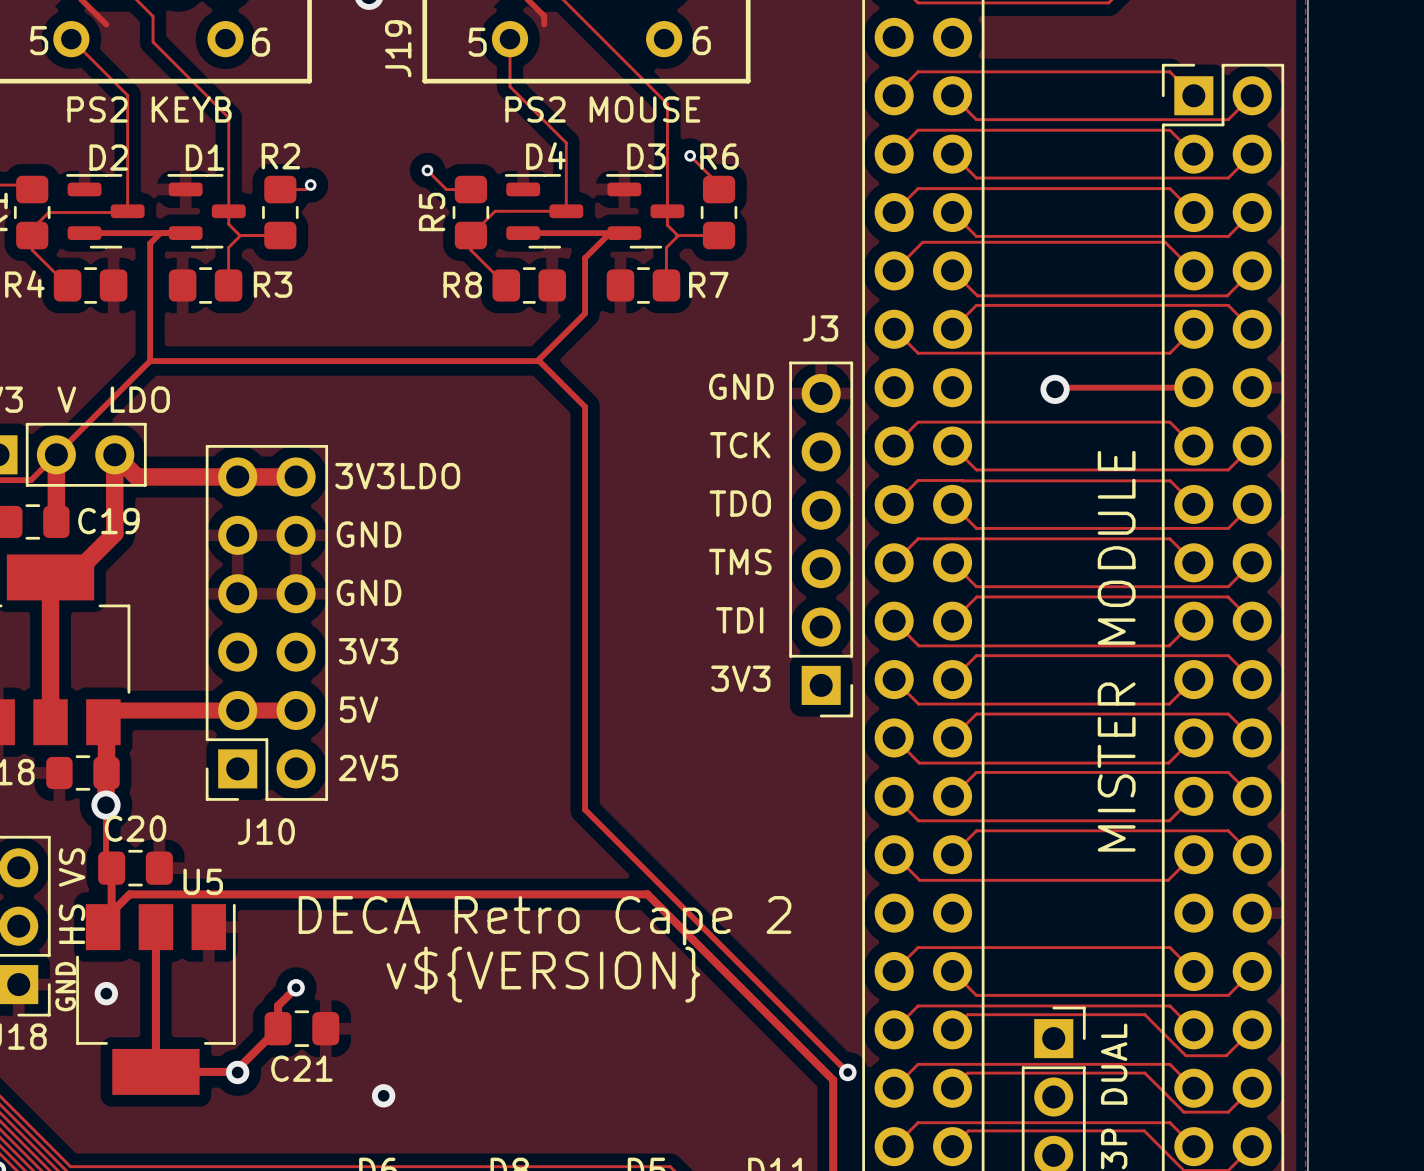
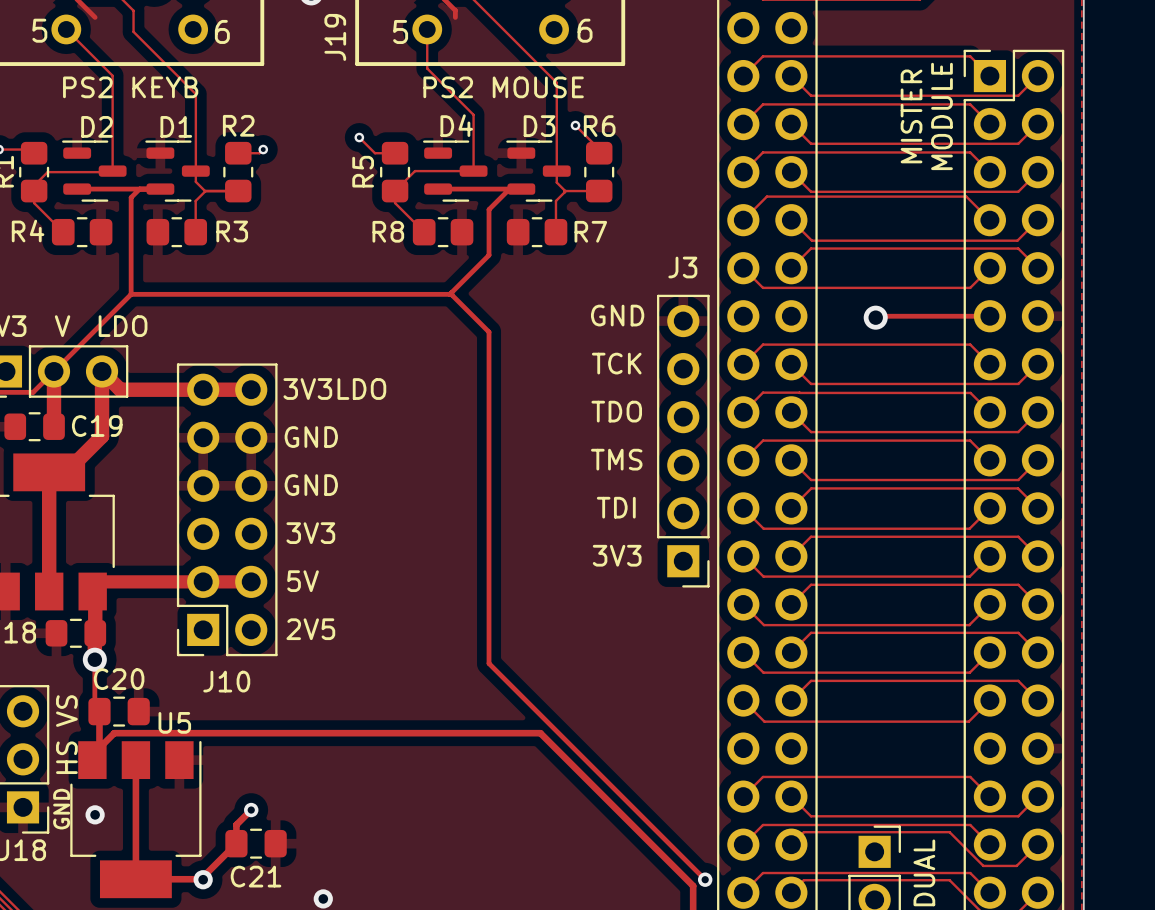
text: none -> MISTER (911, 116)
text: none -> MODULE (941, 116)
text: MISTER MODULE (1116, 651) -> none
text: DECA Retro Cape 2 (545, 920) -> none
text: v${VERSION} (543, 974) -> none

